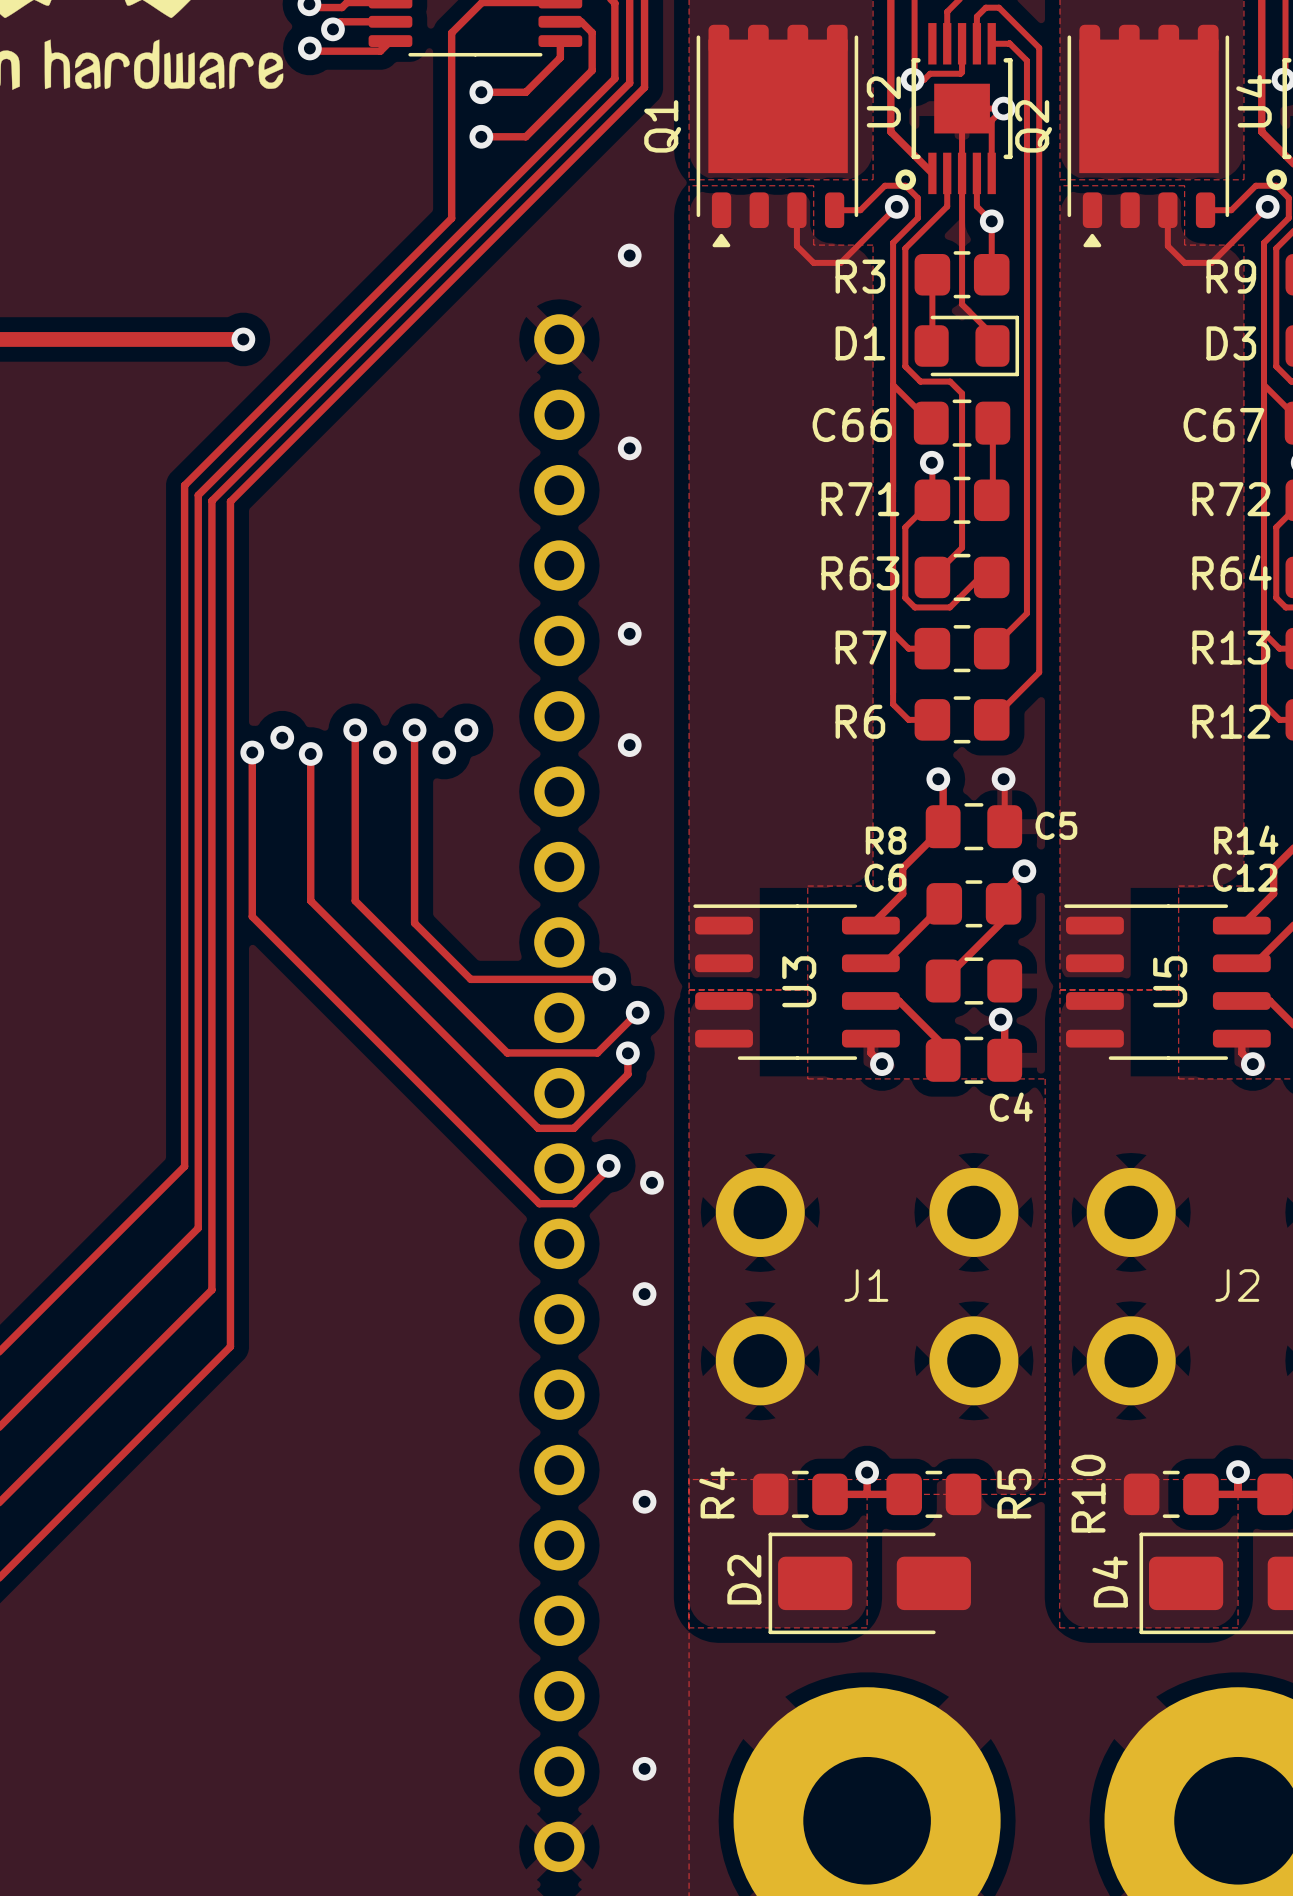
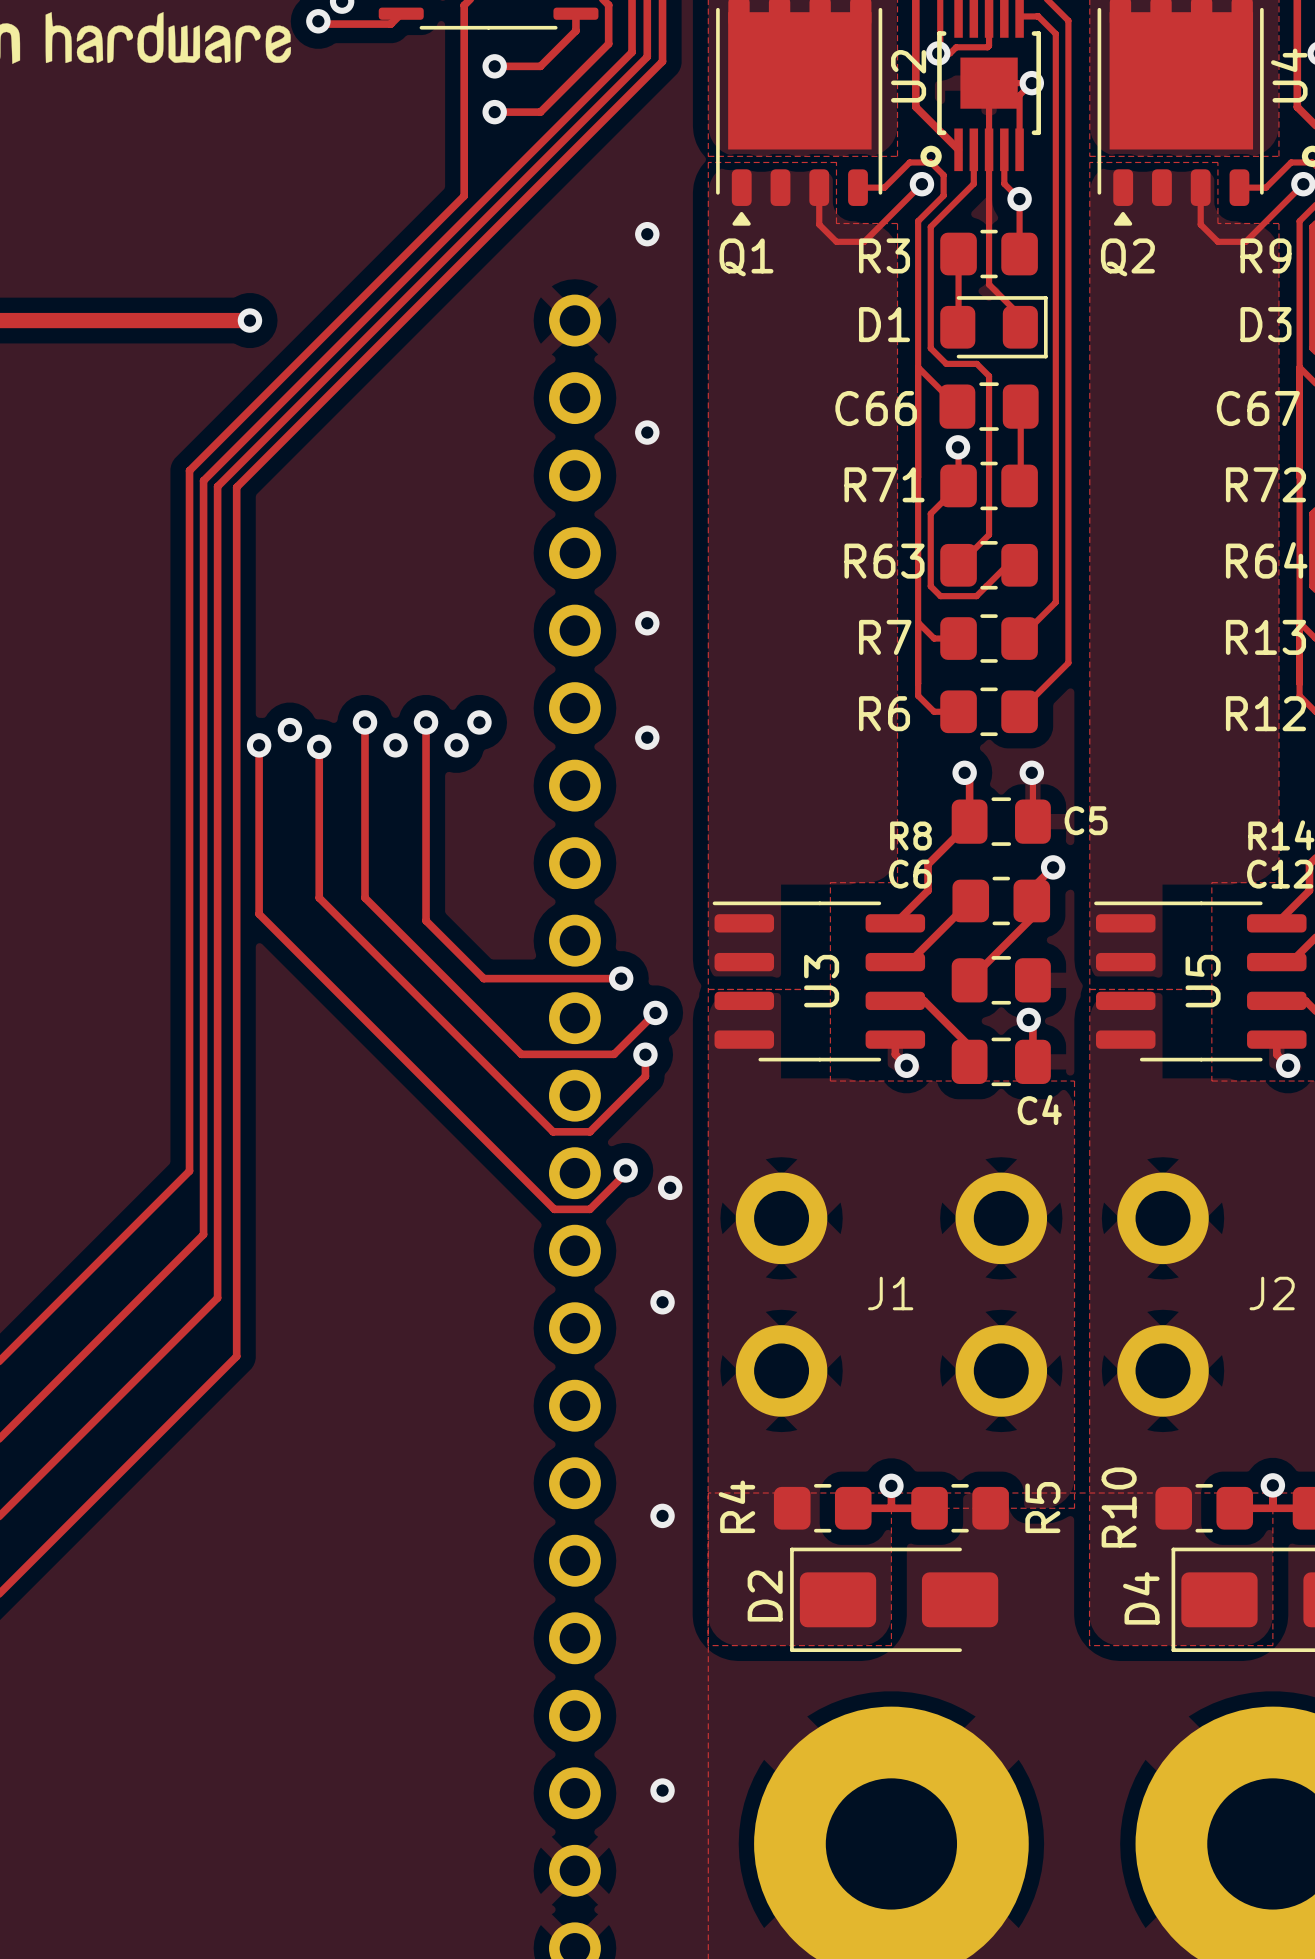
Q1 name rotation: 0° (662, 126) -> 90° clockwise (746, 257)
Q1 name position: Q1 (662, 126) -> Q1 (746, 257)
Q2 name rotation: 0° (1033, 126) -> 90° clockwise (1127, 257)
Q2 name position: Q2 (1033, 126) -> Q2 (1127, 257)

